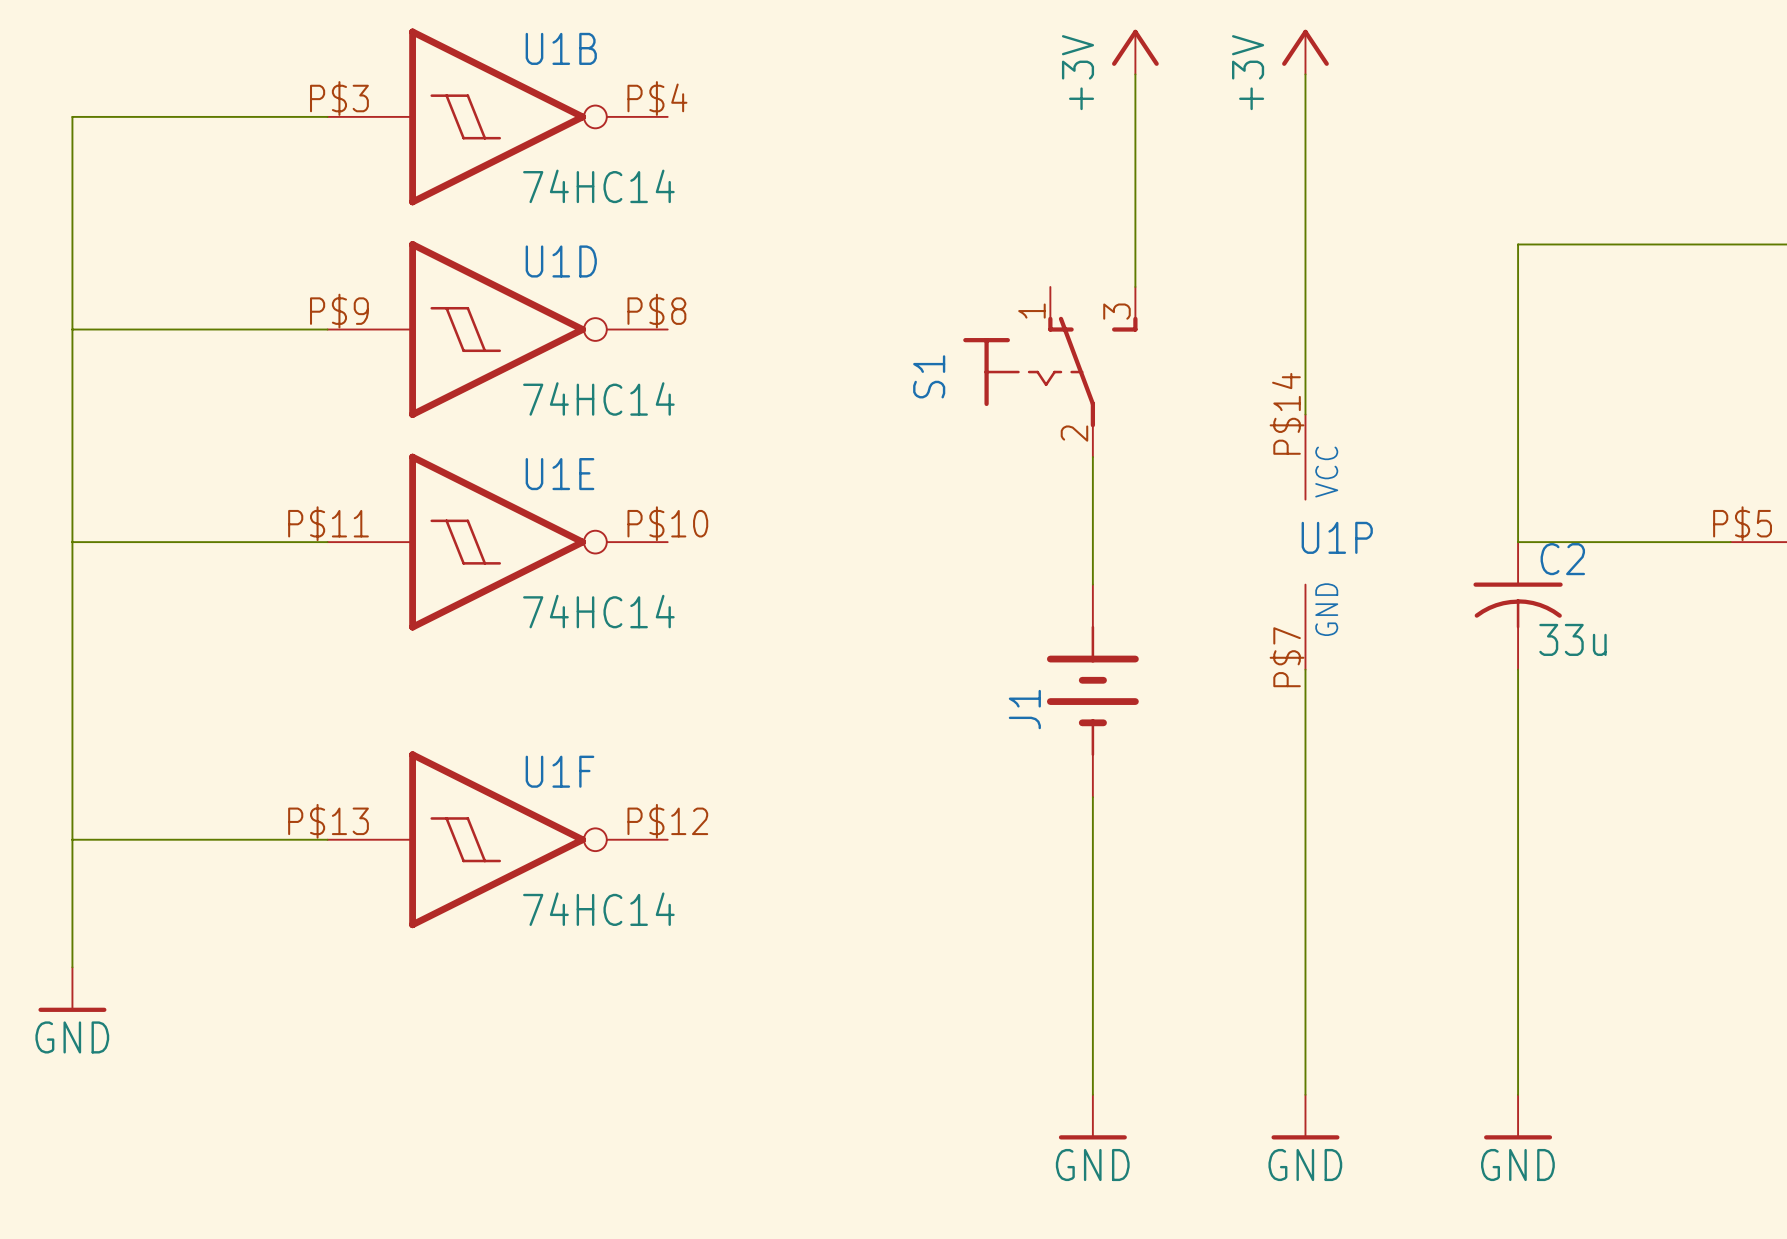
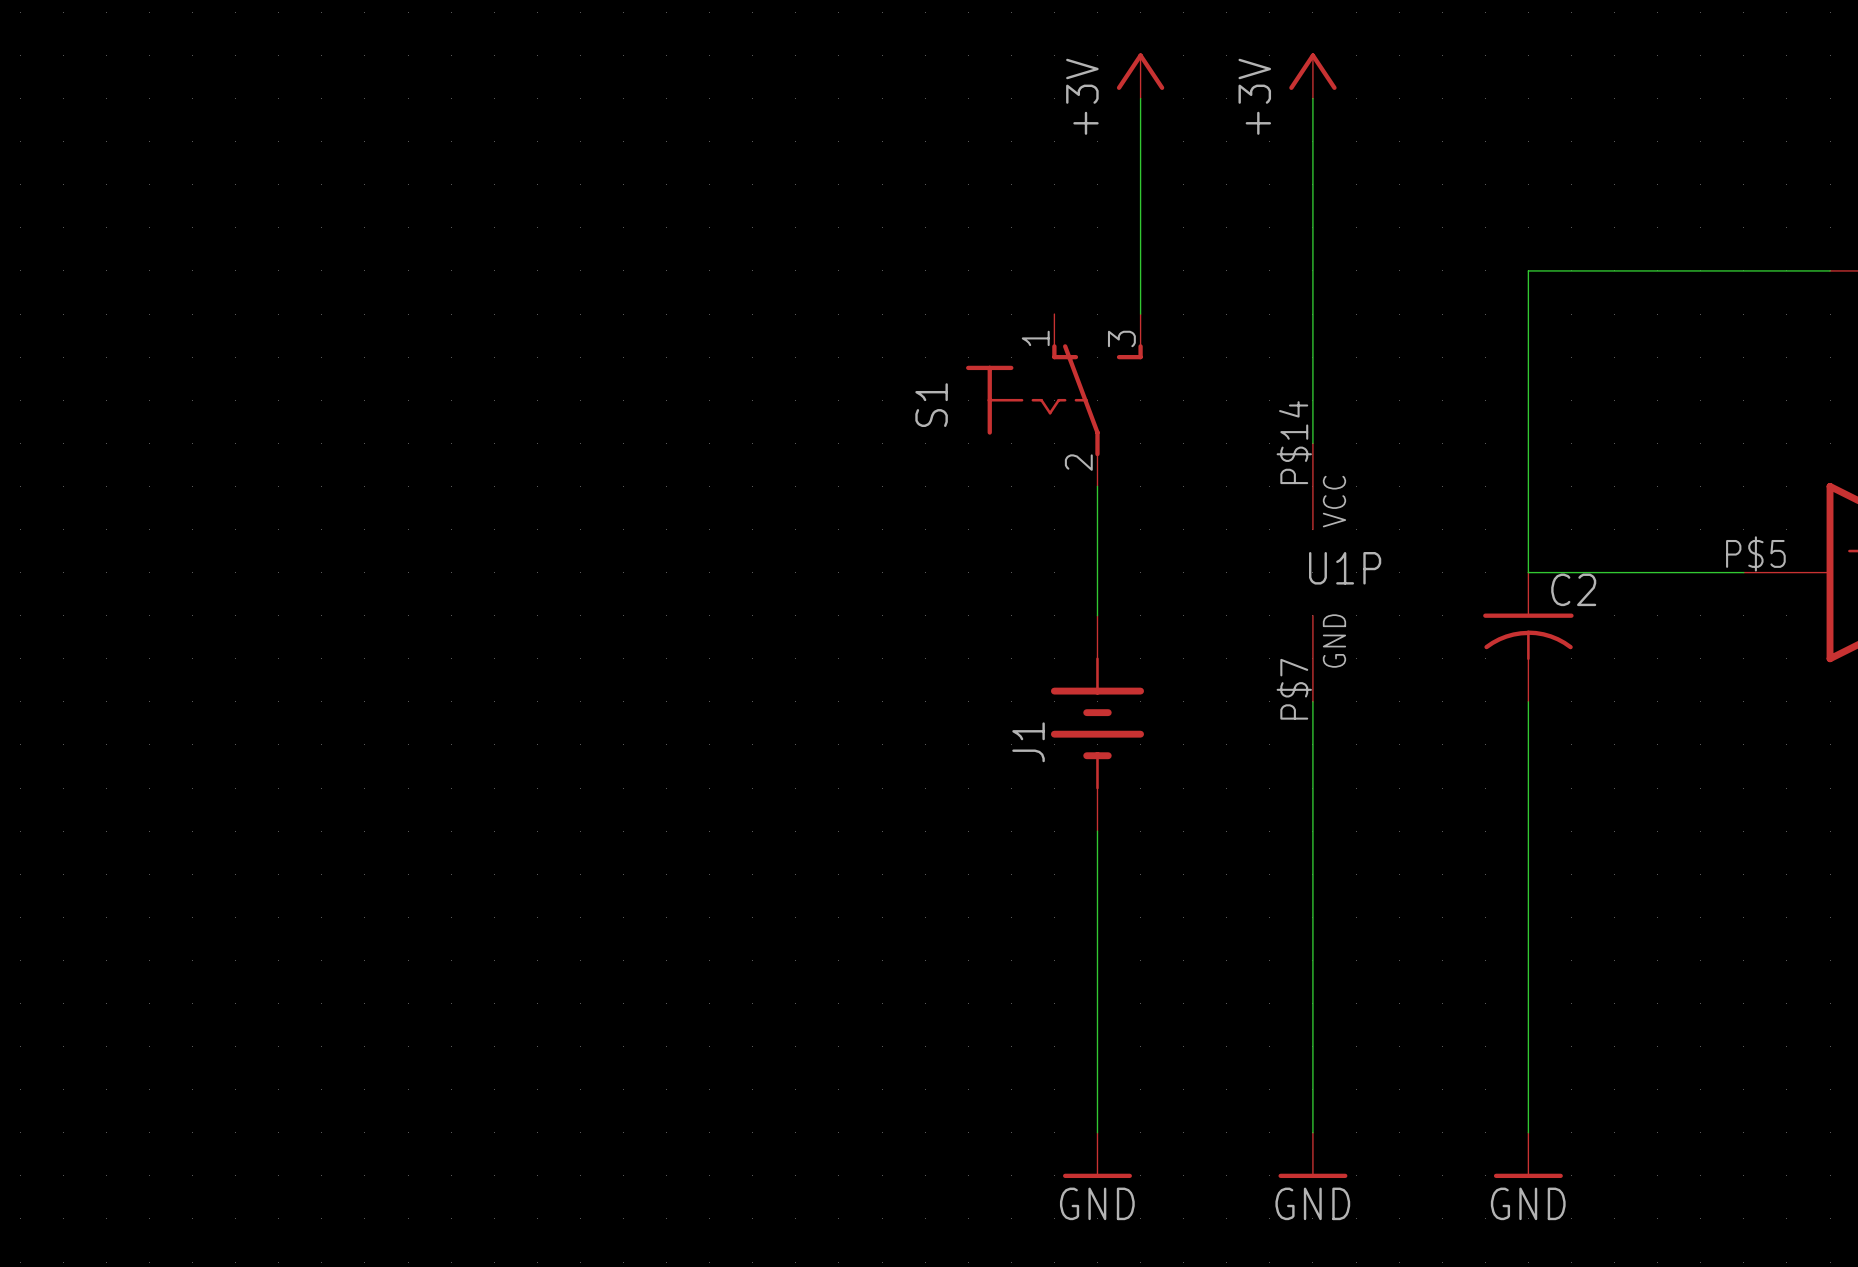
wire: (327, 116) (72, 116) (72, 967) -> none
U1B: 74HC14 (497, 116) -> none
wire: (72, 329) (327, 329) -> none
U1D: 74HC14 (497, 329) -> none
wire: (72, 542) (327, 542) -> none
U1E: 74HC14 (497, 542) -> none
C2 value: 33u (1572, 639) -> none
wire: (72, 839) (327, 839) -> none
U1F: 74HC14 (497, 839) -> none
power symbol: GND (72, 989) -> none

